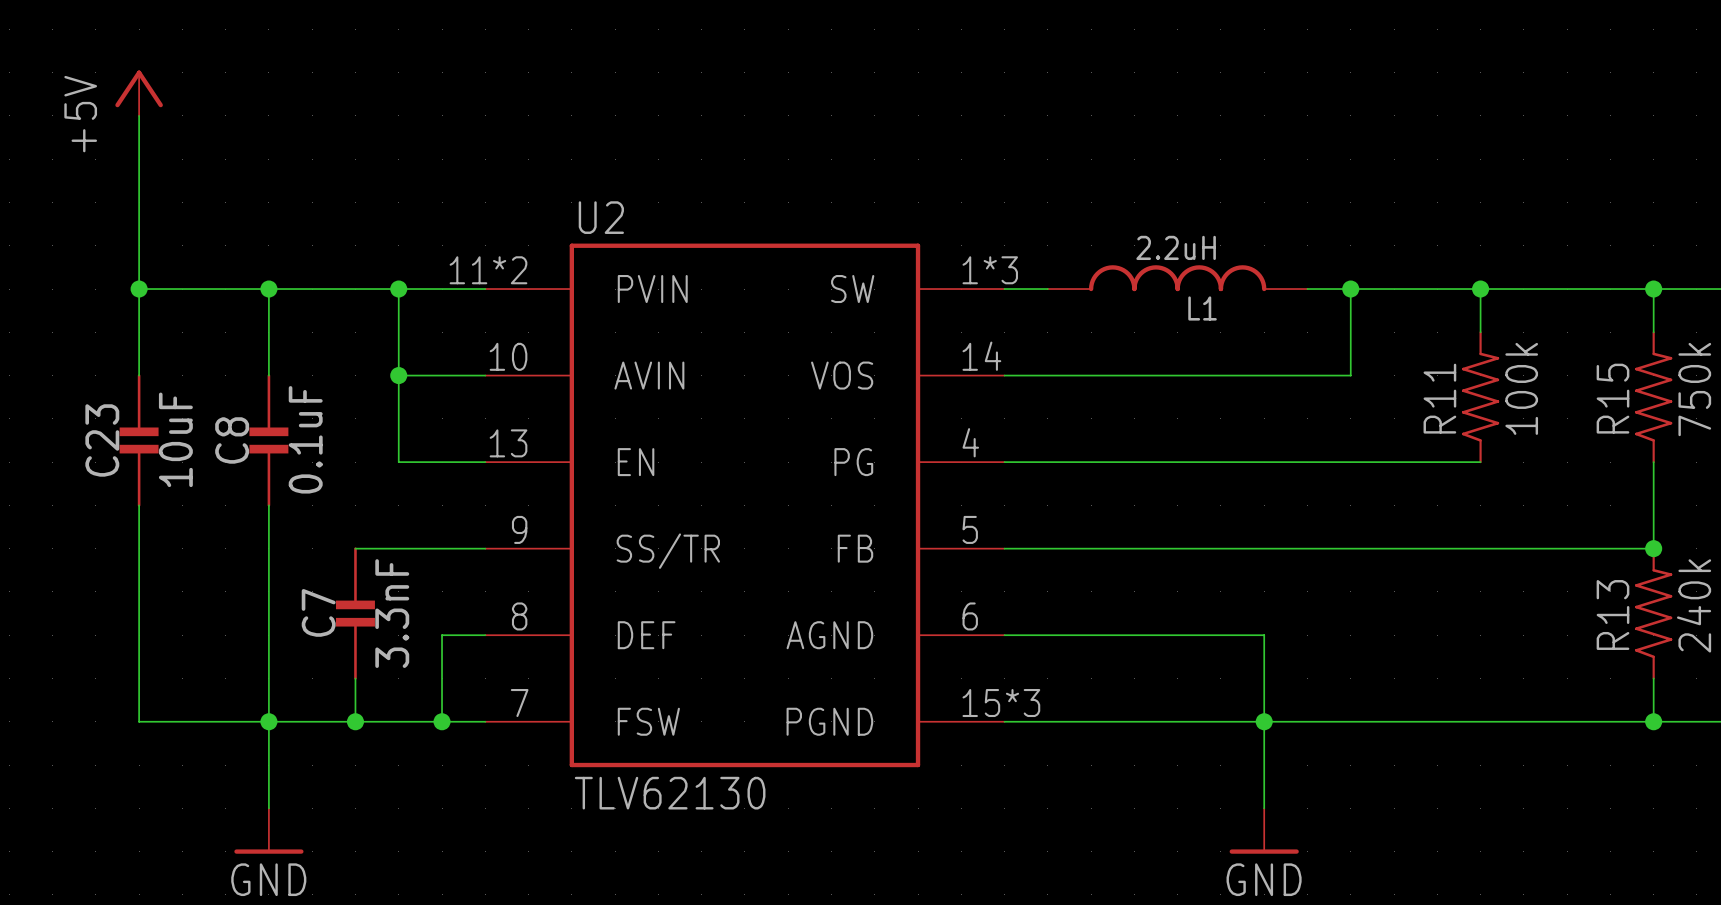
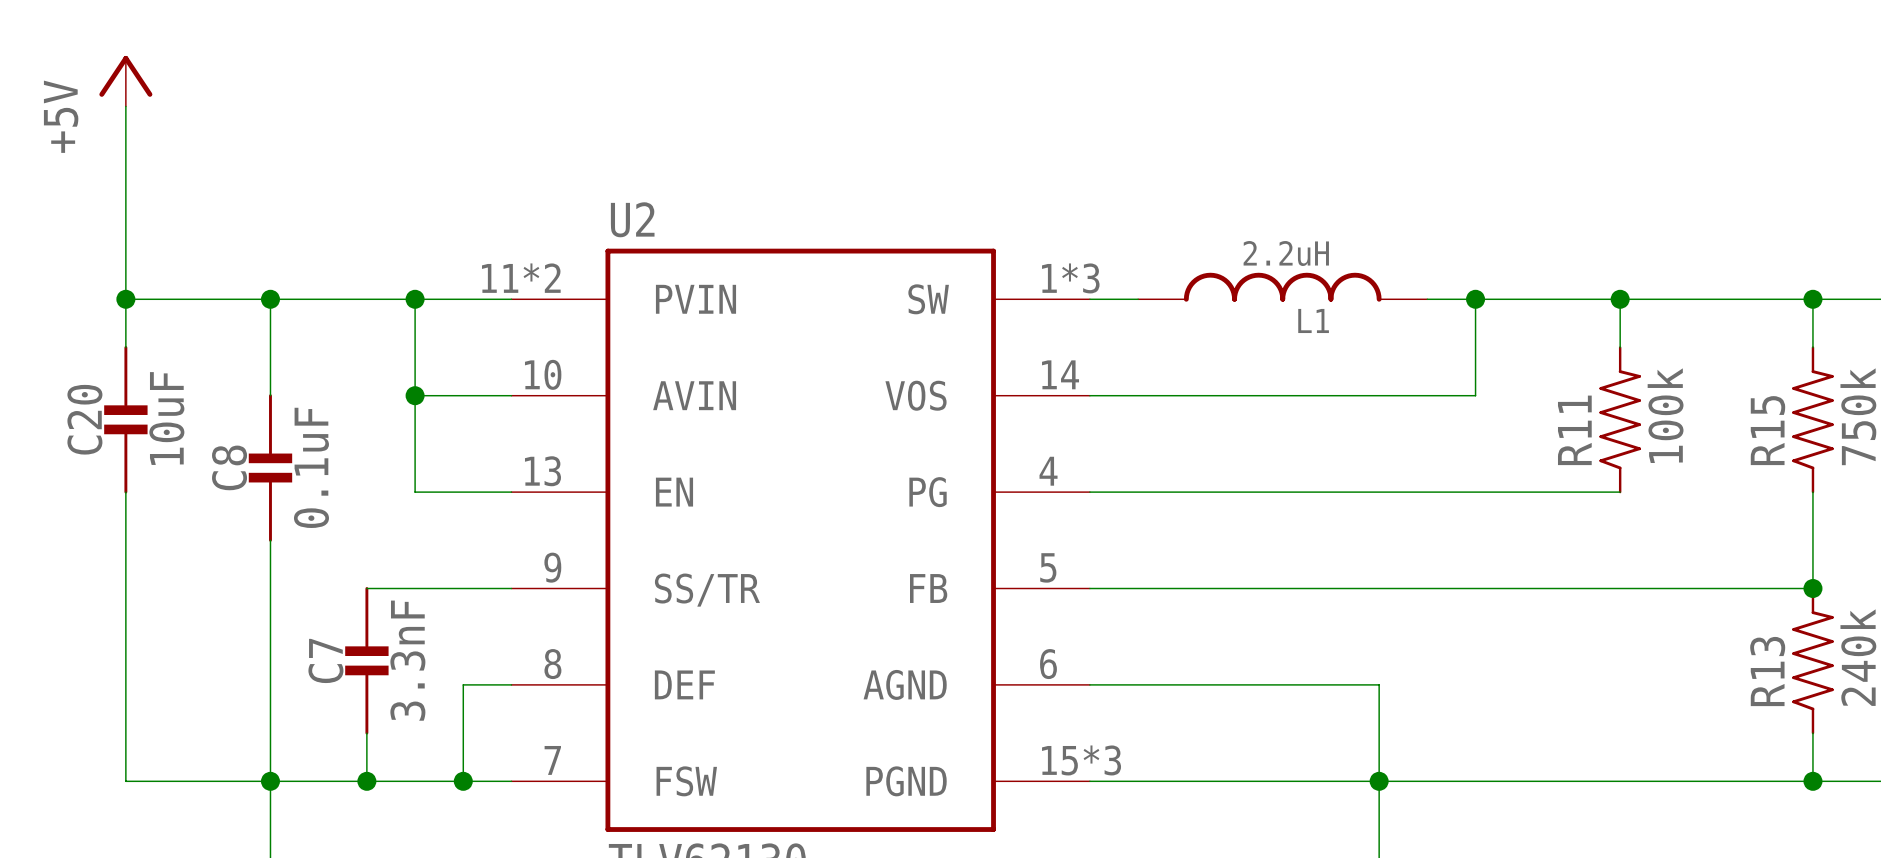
C20: none -> 10uF (125, 419)
C23: 10uF (139, 440) -> none

